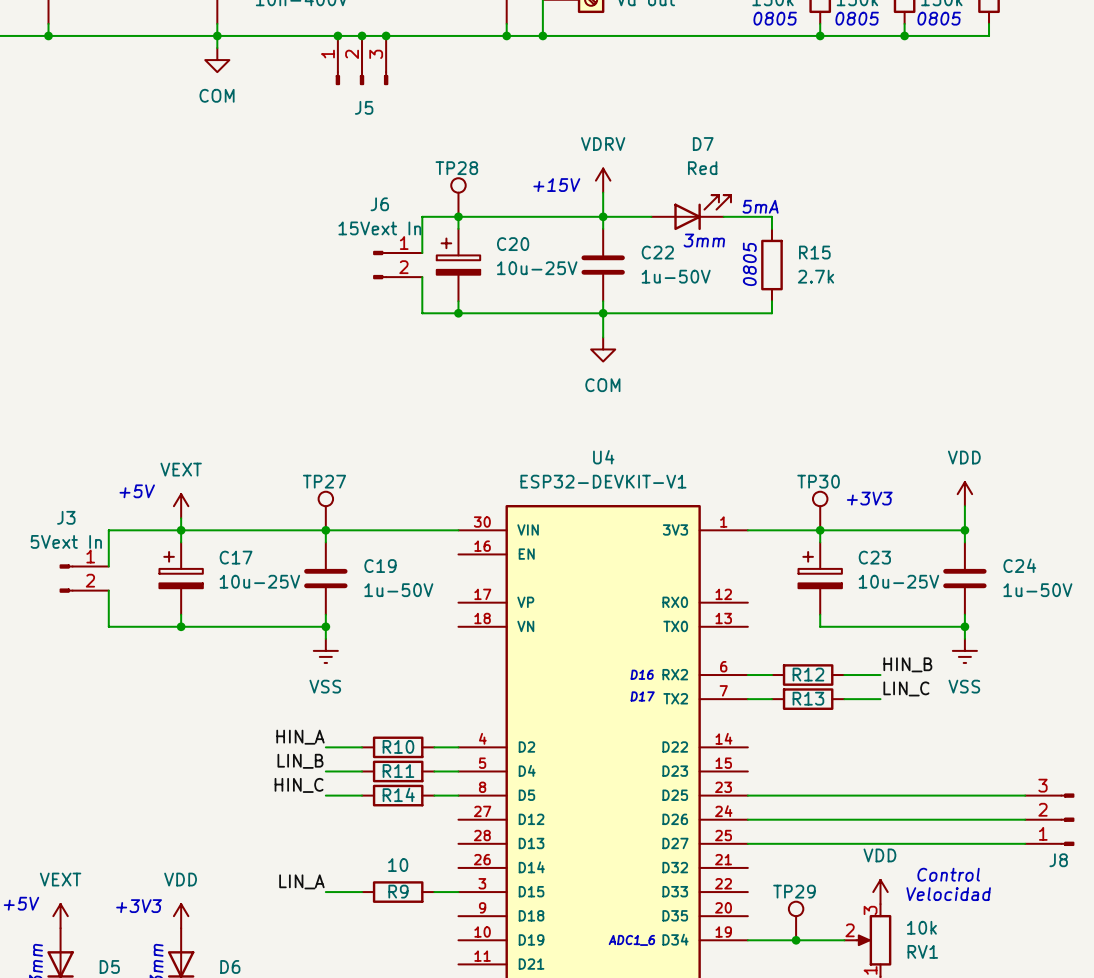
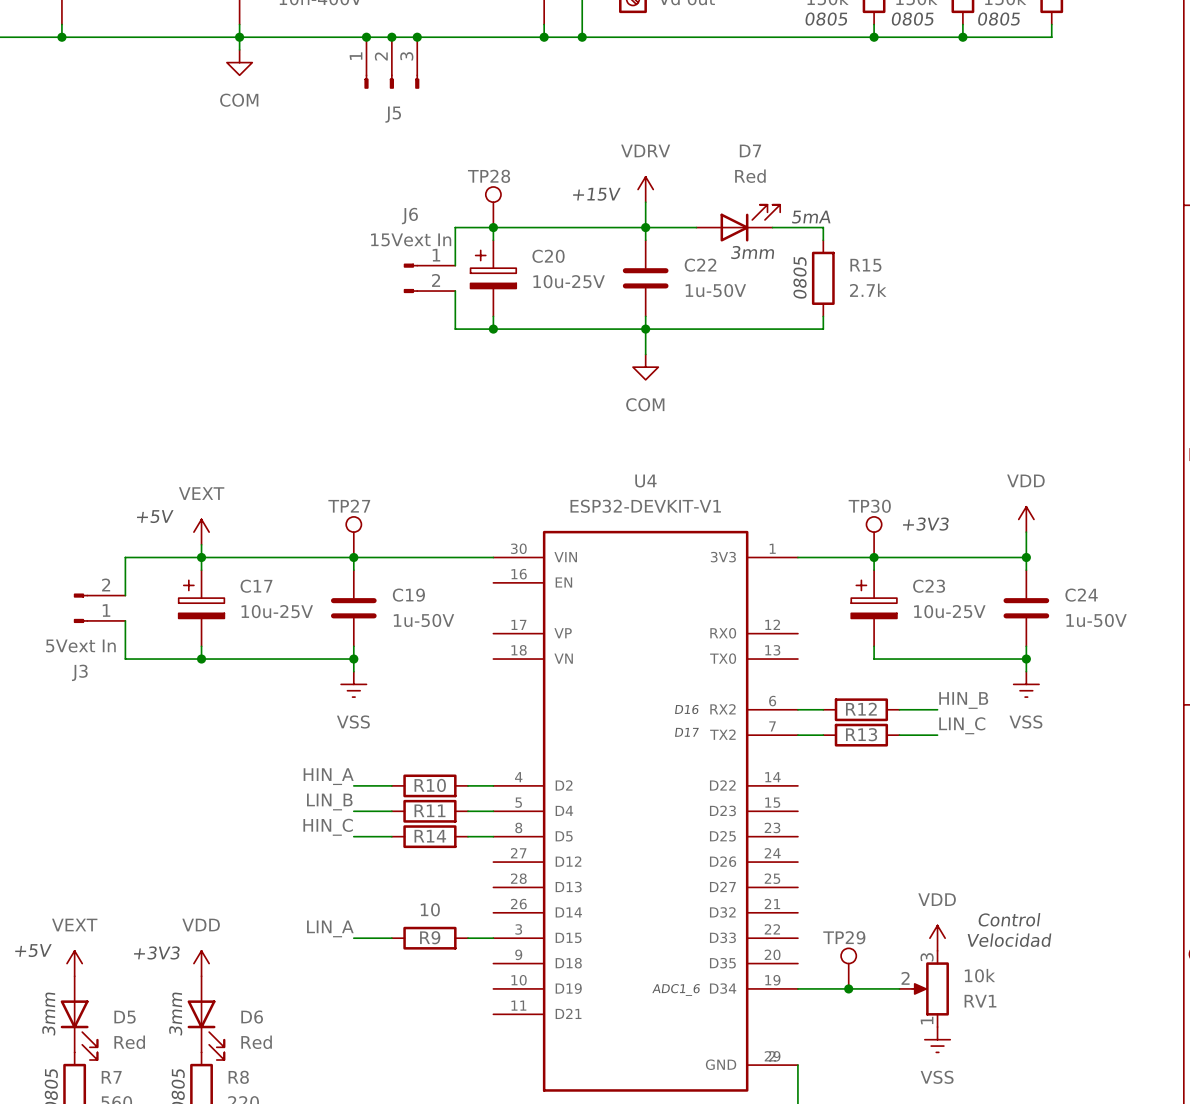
J3 flip: as is (66, 578) -> up-down (80, 608)
wire: (747, 795) (1025, 795) -> none
wire: (747, 819) (1025, 819) -> none
J8: (1049, 819) -> none
wire: (747, 843) (1025, 843) -> none

